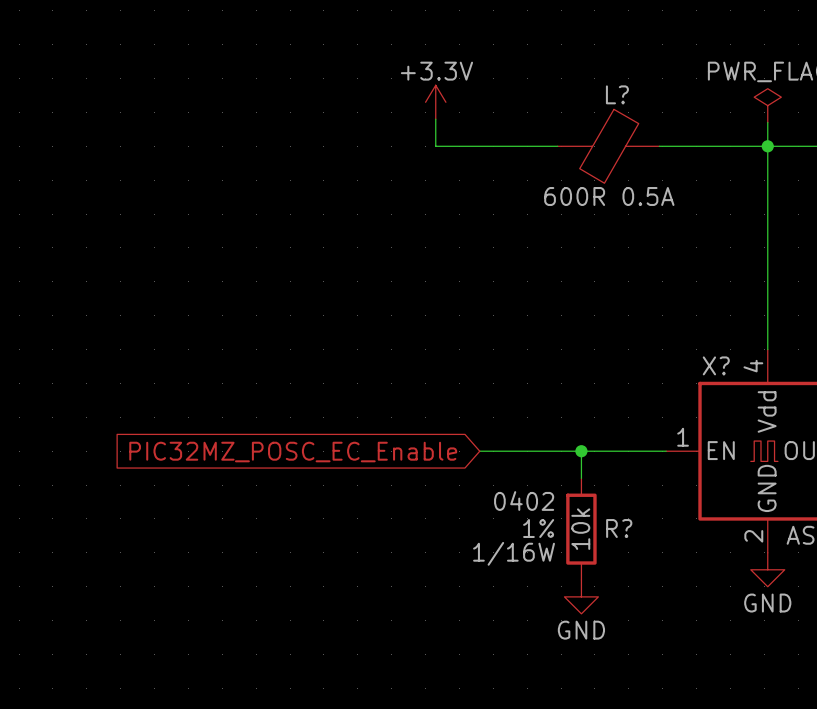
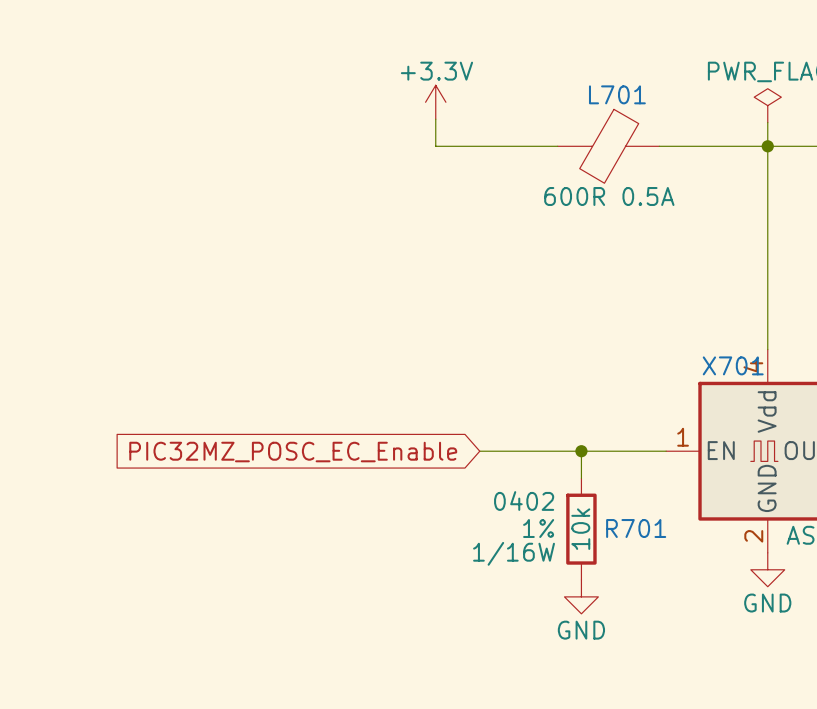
L? name: L? (617, 94) -> L701 (617, 94)
X? name: X? (716, 365) -> X701 (733, 365)
R? name: R? (619, 528) -> R701 (636, 528)

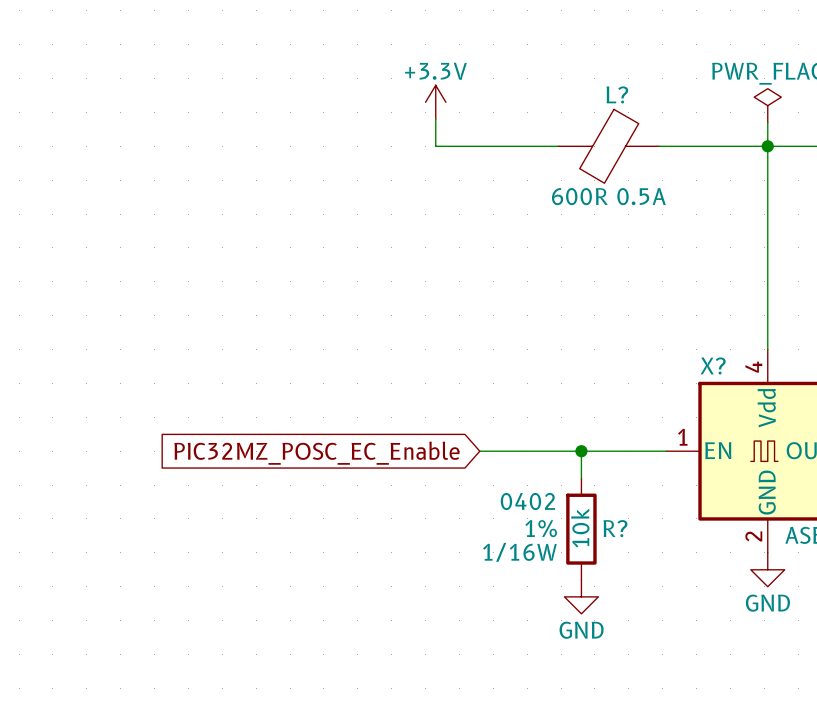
L701 name: L701 (617, 94) -> L? (617, 94)
X701 name: X701 (733, 365) -> X? (713, 365)
R701 name: R701 (636, 528) -> R? (615, 528)

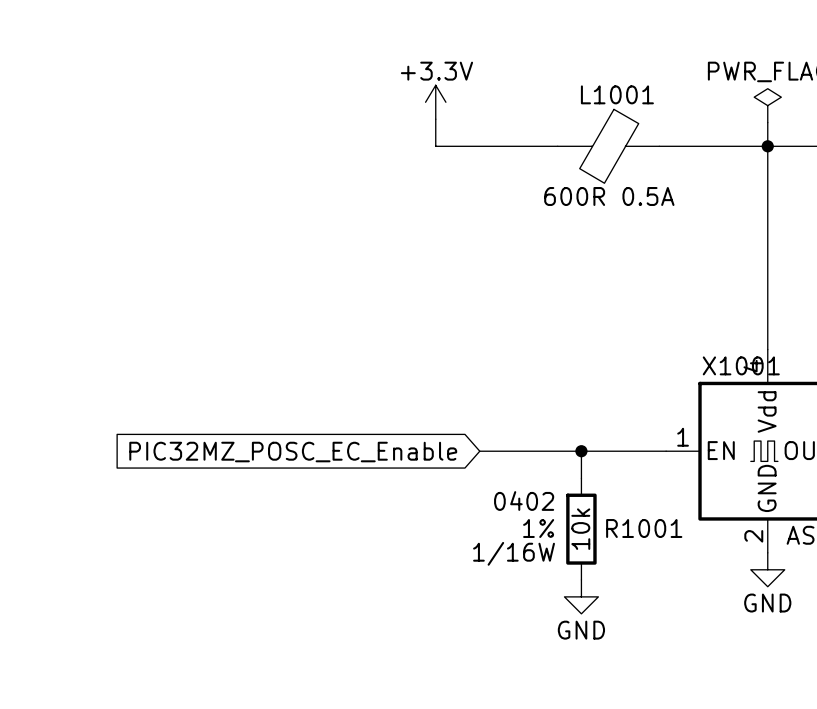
L? name: L? (617, 94) -> L1001 (617, 94)
X? name: X? (713, 365) -> X1001 (741, 365)
R? name: R? (615, 528) -> R1001 (644, 528)

